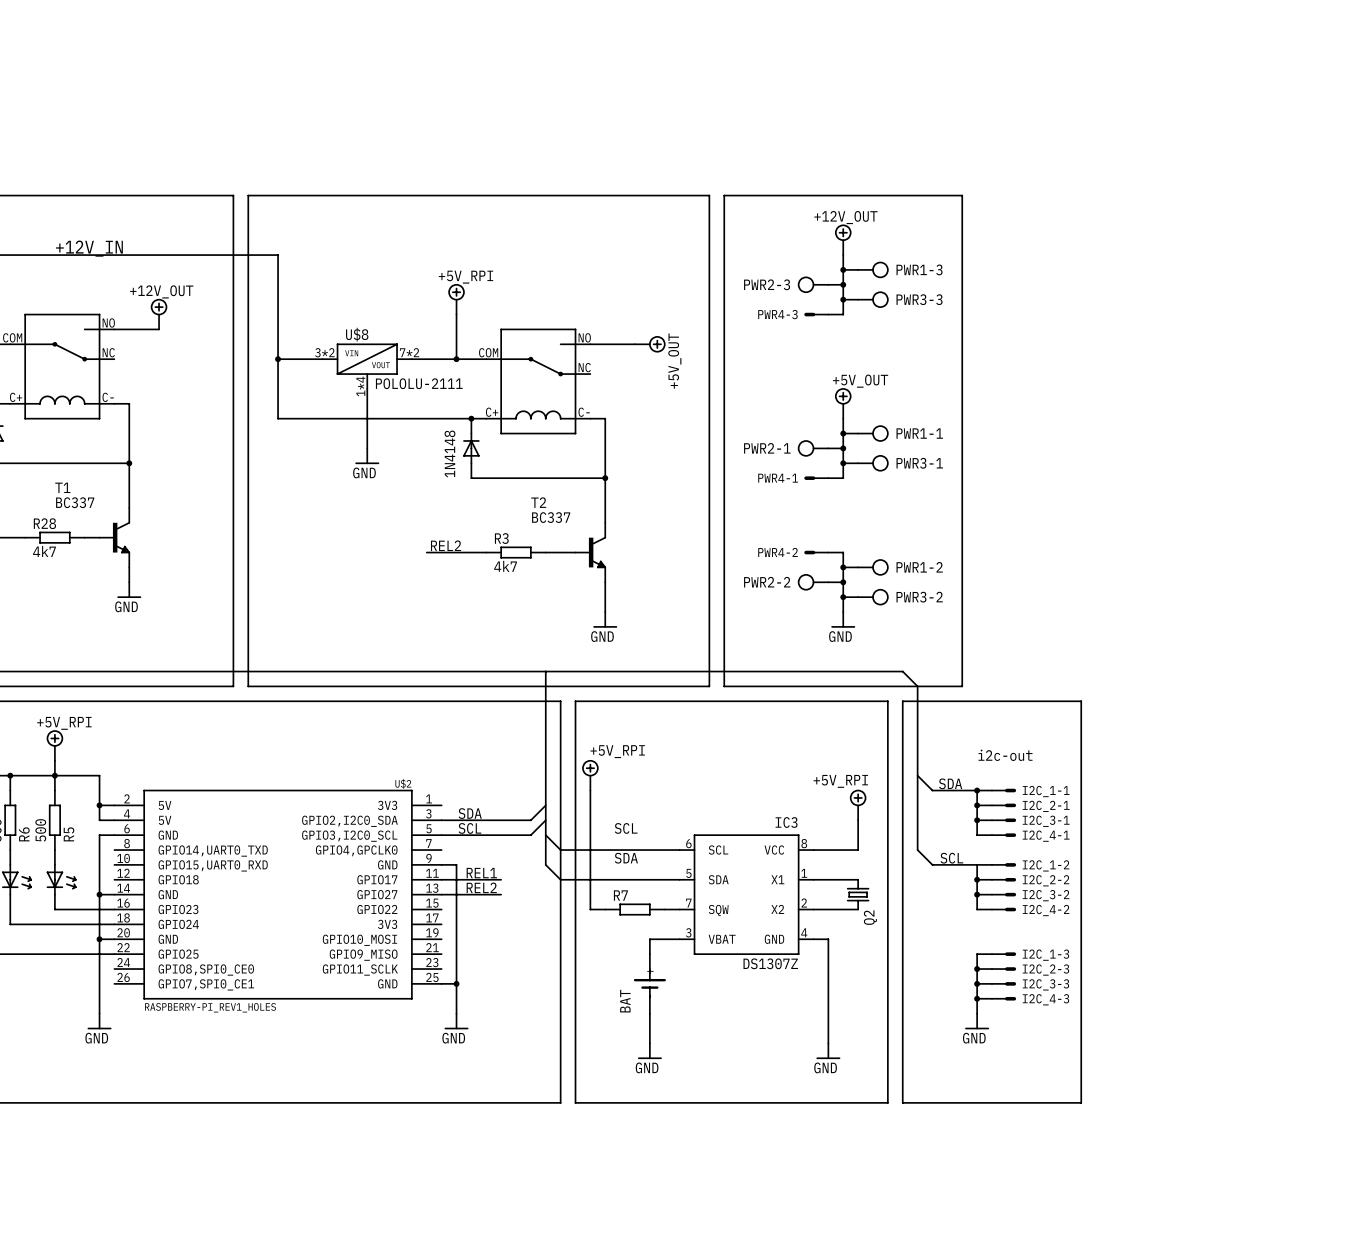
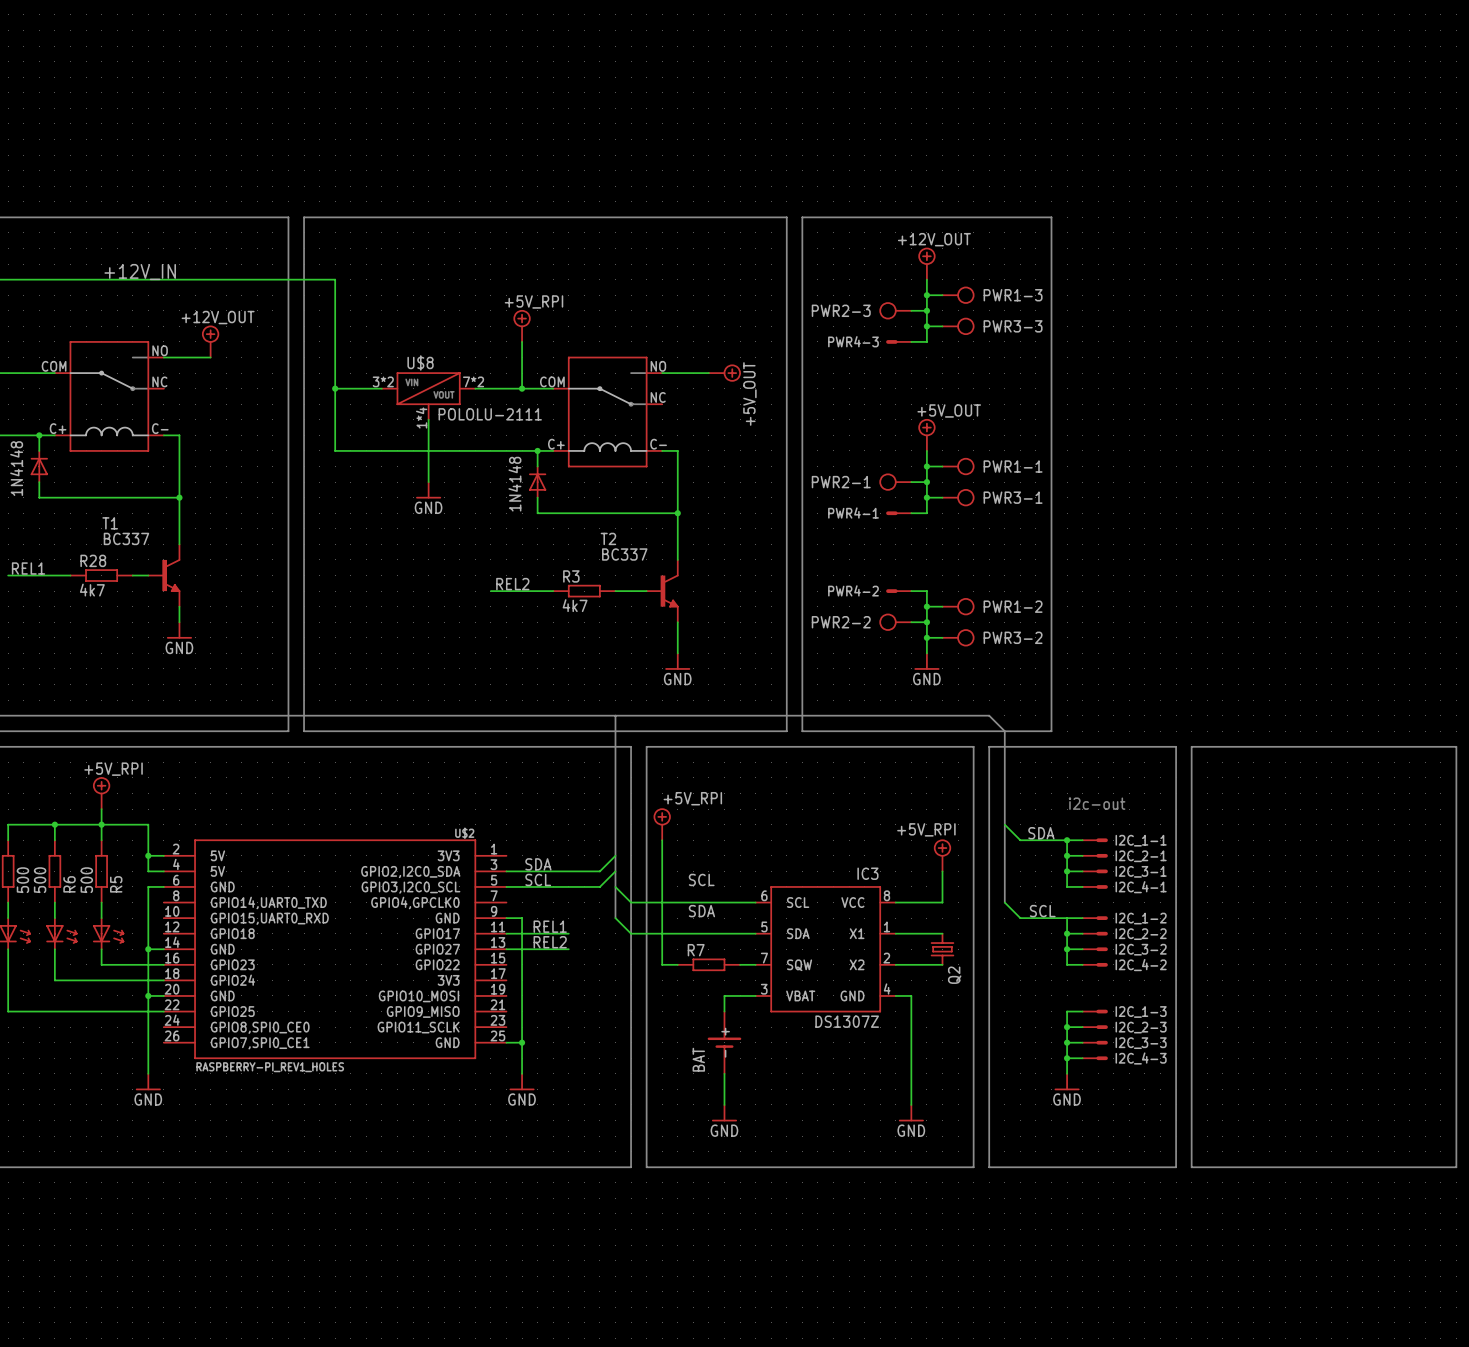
line: none -> (1191, 746) (1191, 1167) (1456, 1167) (1456, 746) (1191, 746)

